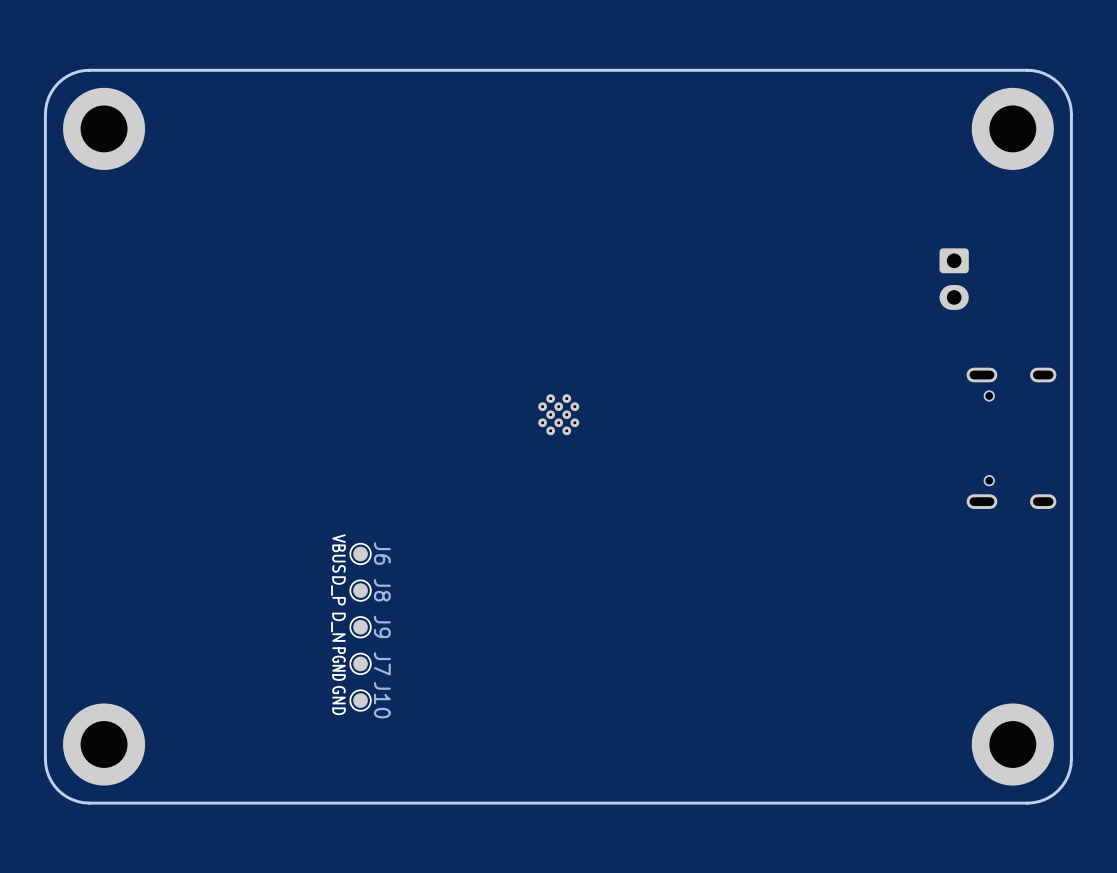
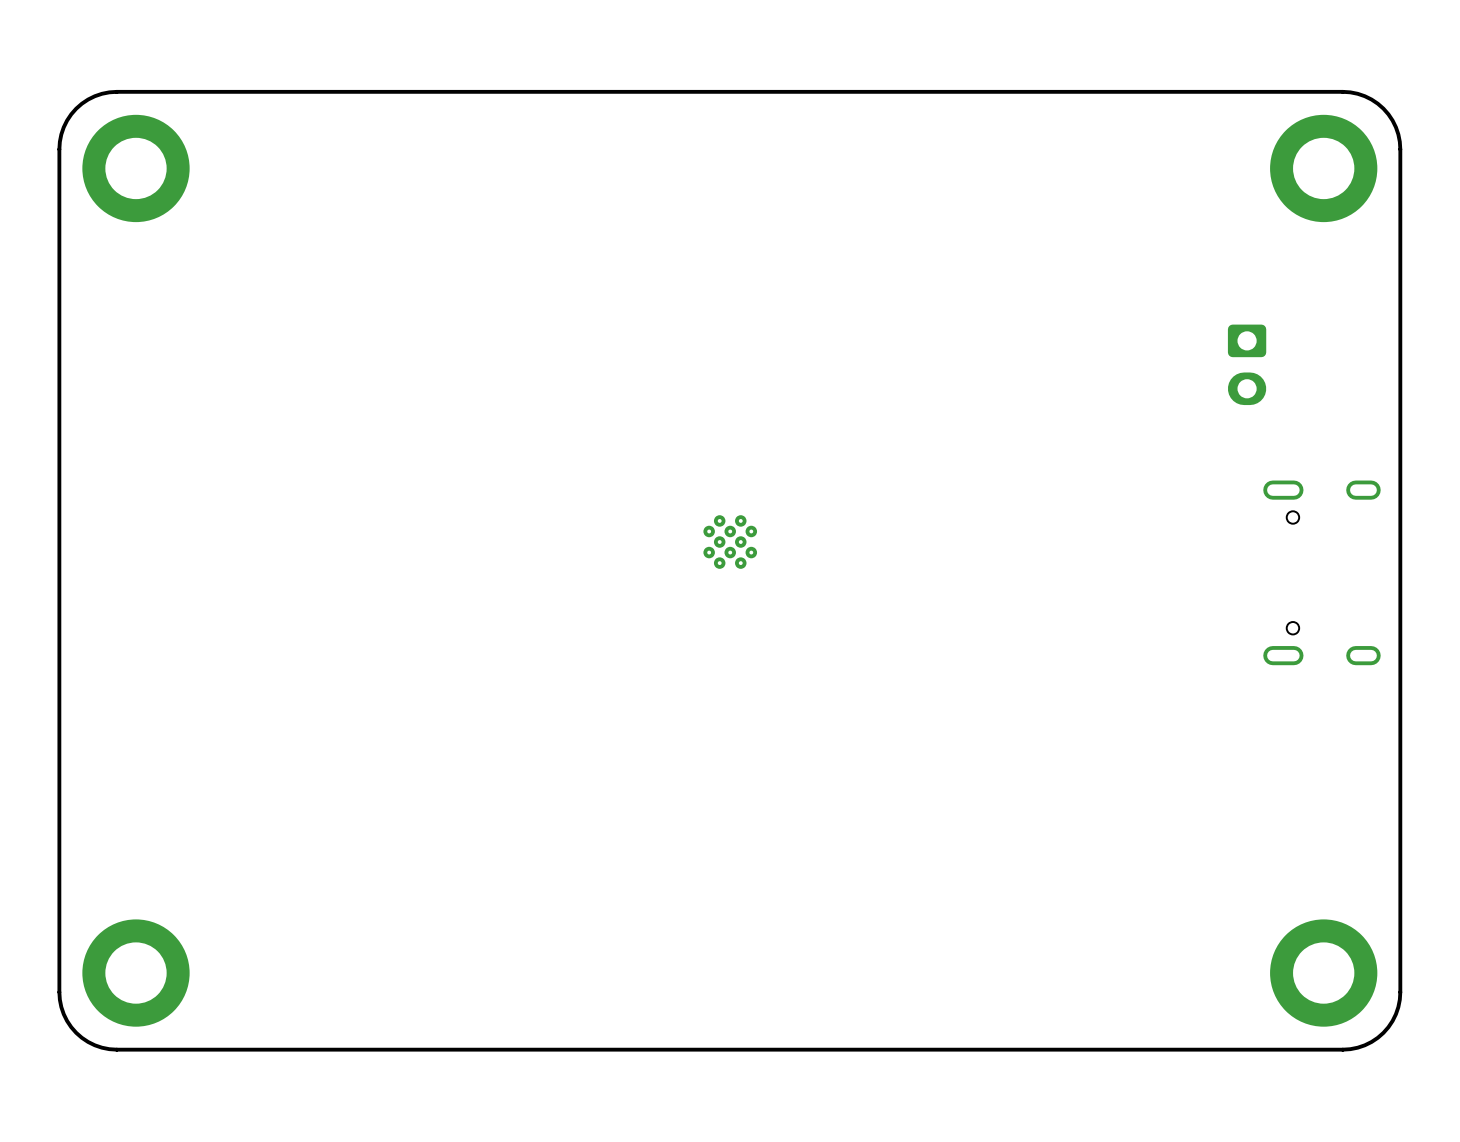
J6: (360, 553) -> none
J8: (360, 590) -> none
J9: (360, 627) -> none
J7: (360, 663) -> none
J10: (360, 700) -> none

